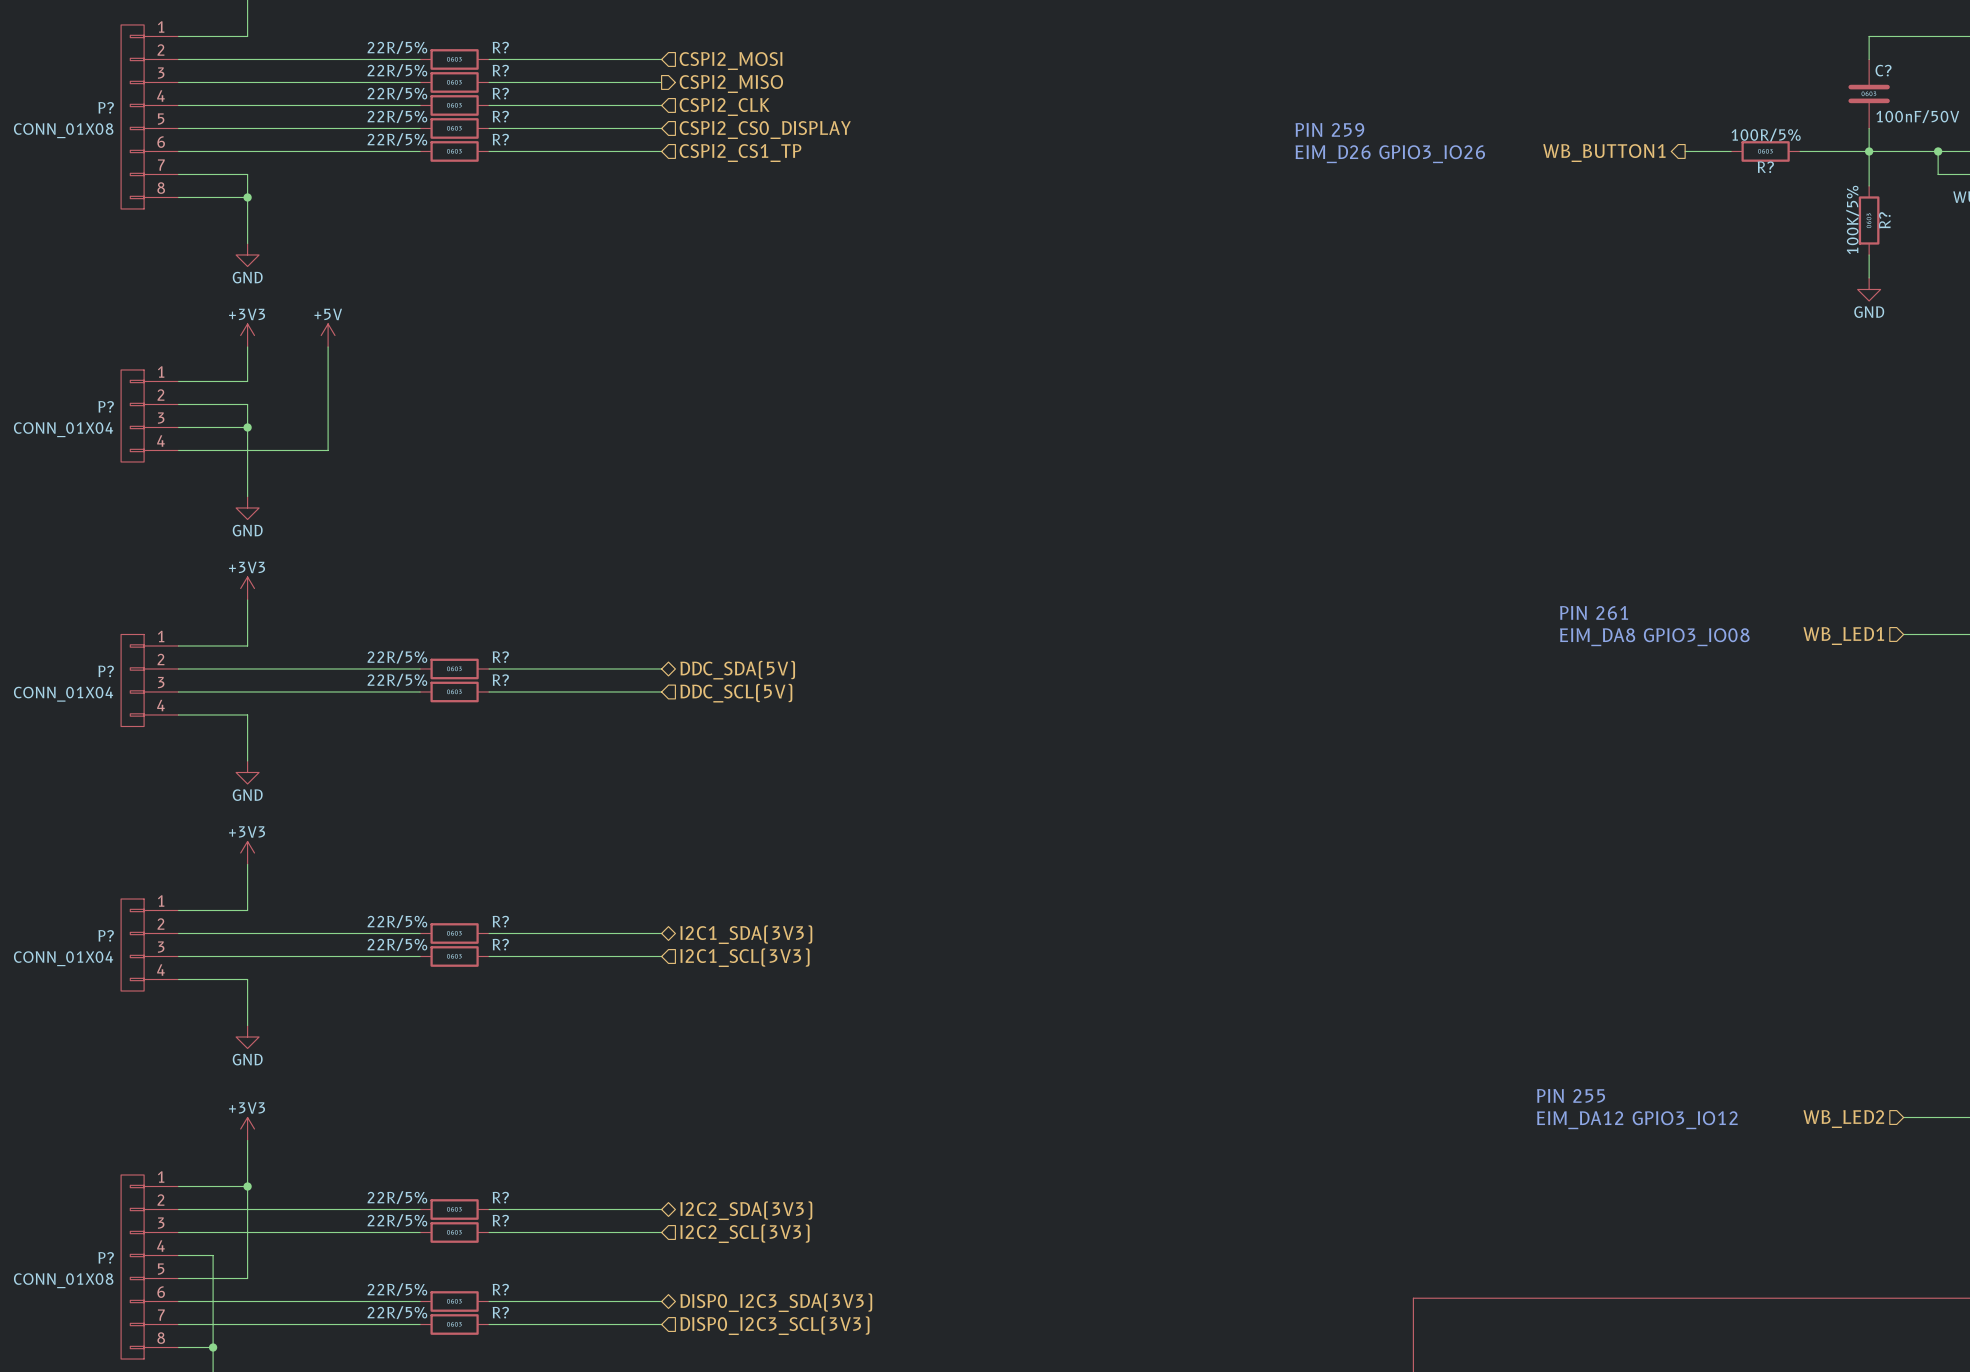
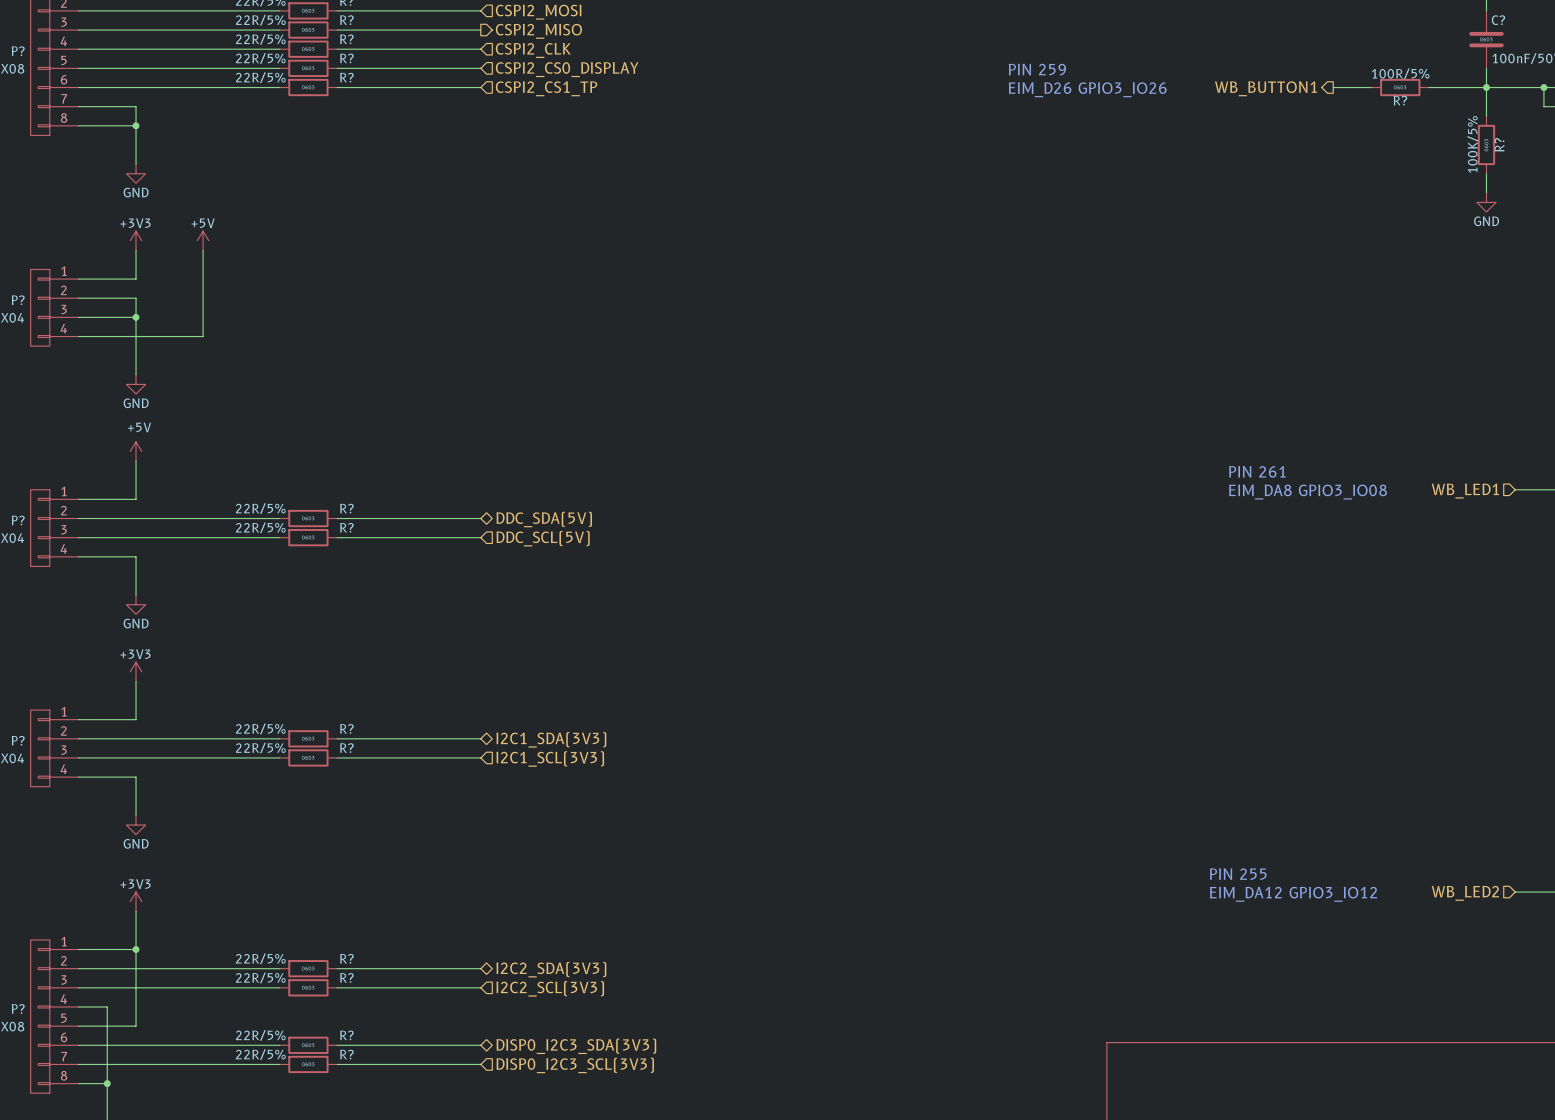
power symbol: +3V3 (247, 588) -> +5V (136, 451)

